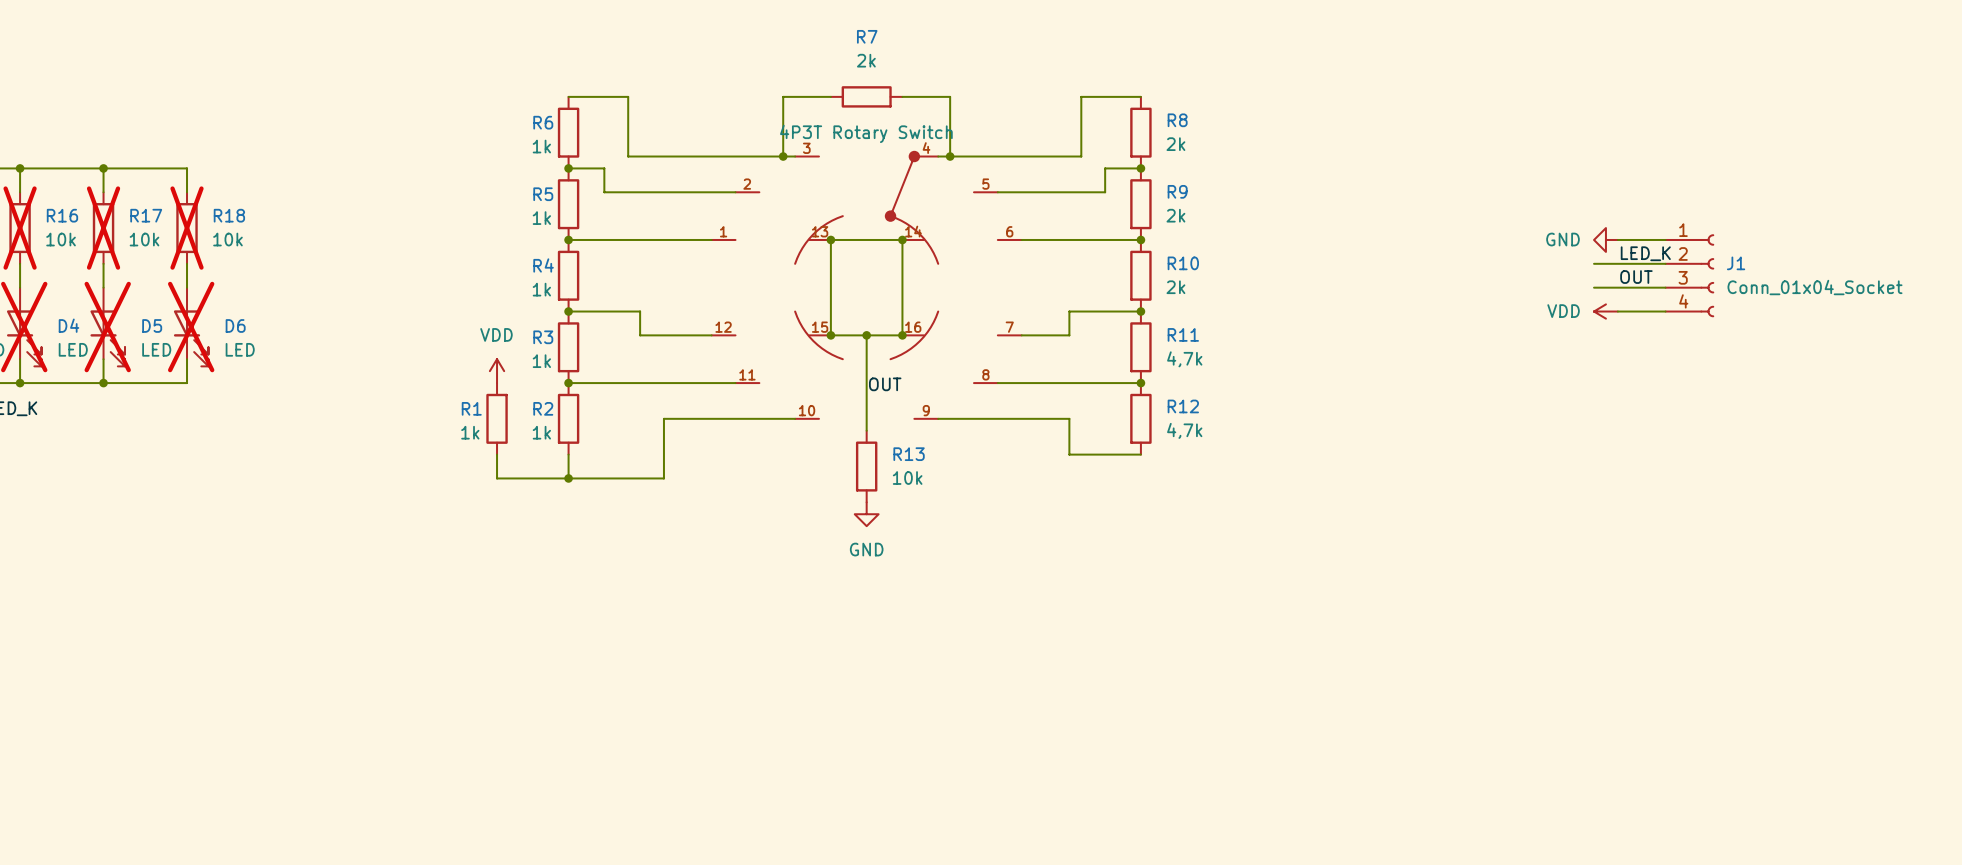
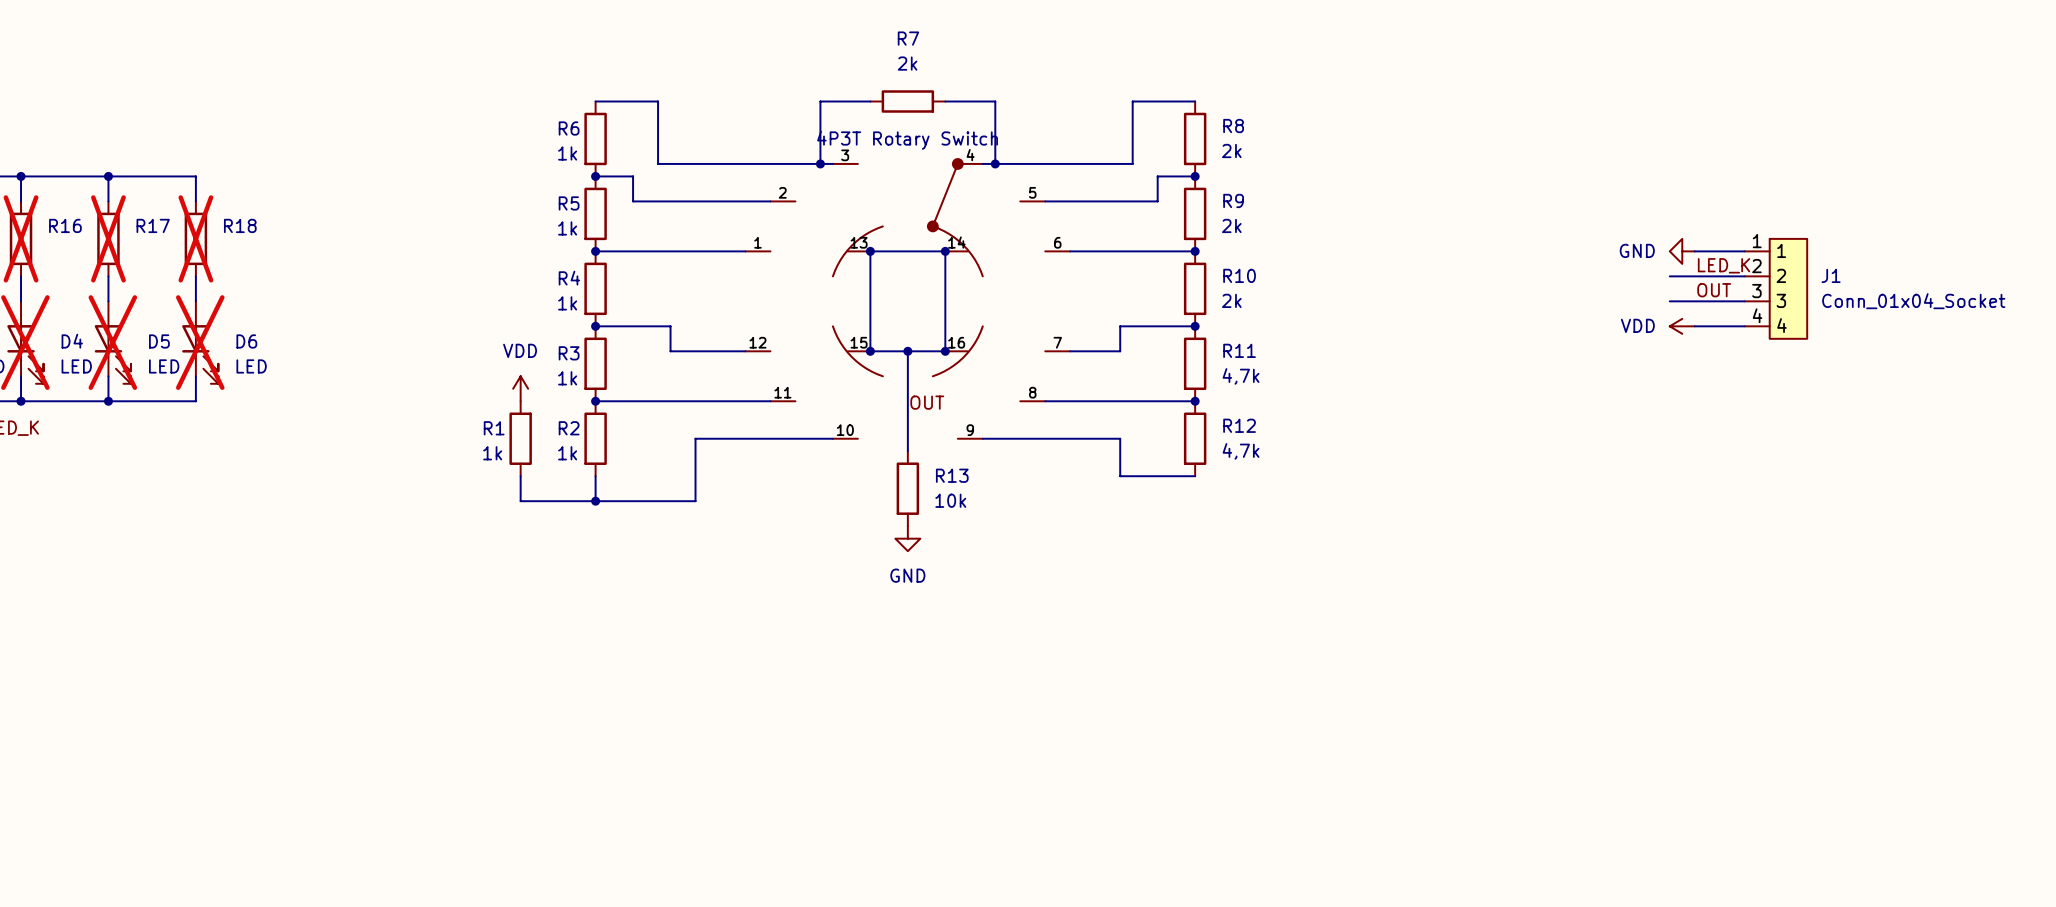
J1 symbol: [1665, 234, 1714, 318] -> [1744, 238, 1808, 339]
R16 value: 10k (61, 239) -> none
R17 value: 10k (144, 239) -> none
R18 value: 10k (227, 239) -> none

